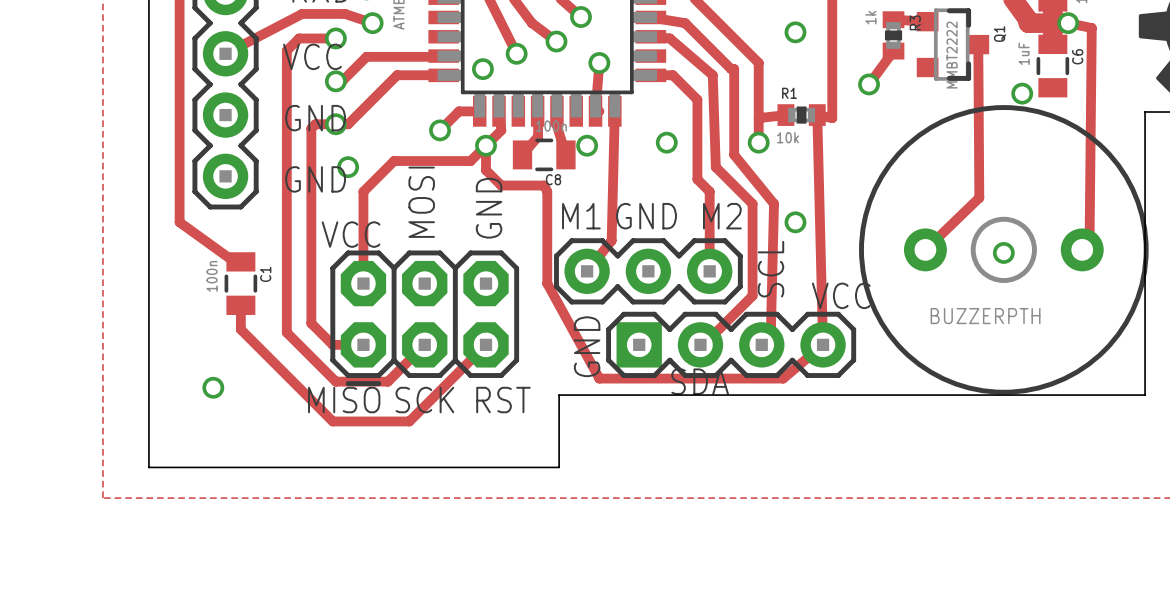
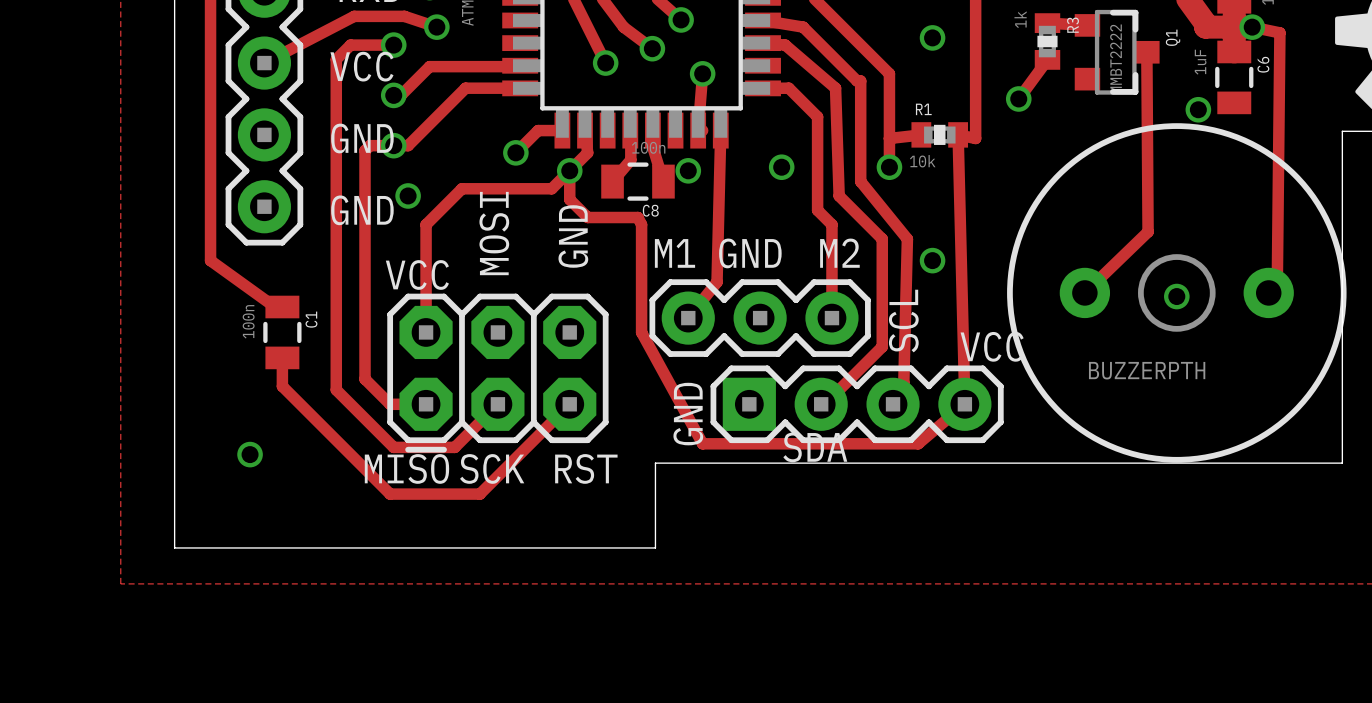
via: (482, 69) -> none

